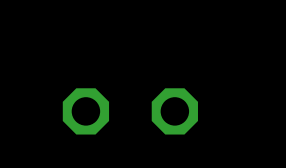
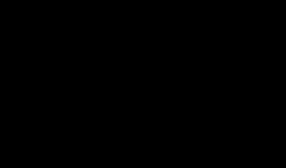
part: (130, 111) -> none

